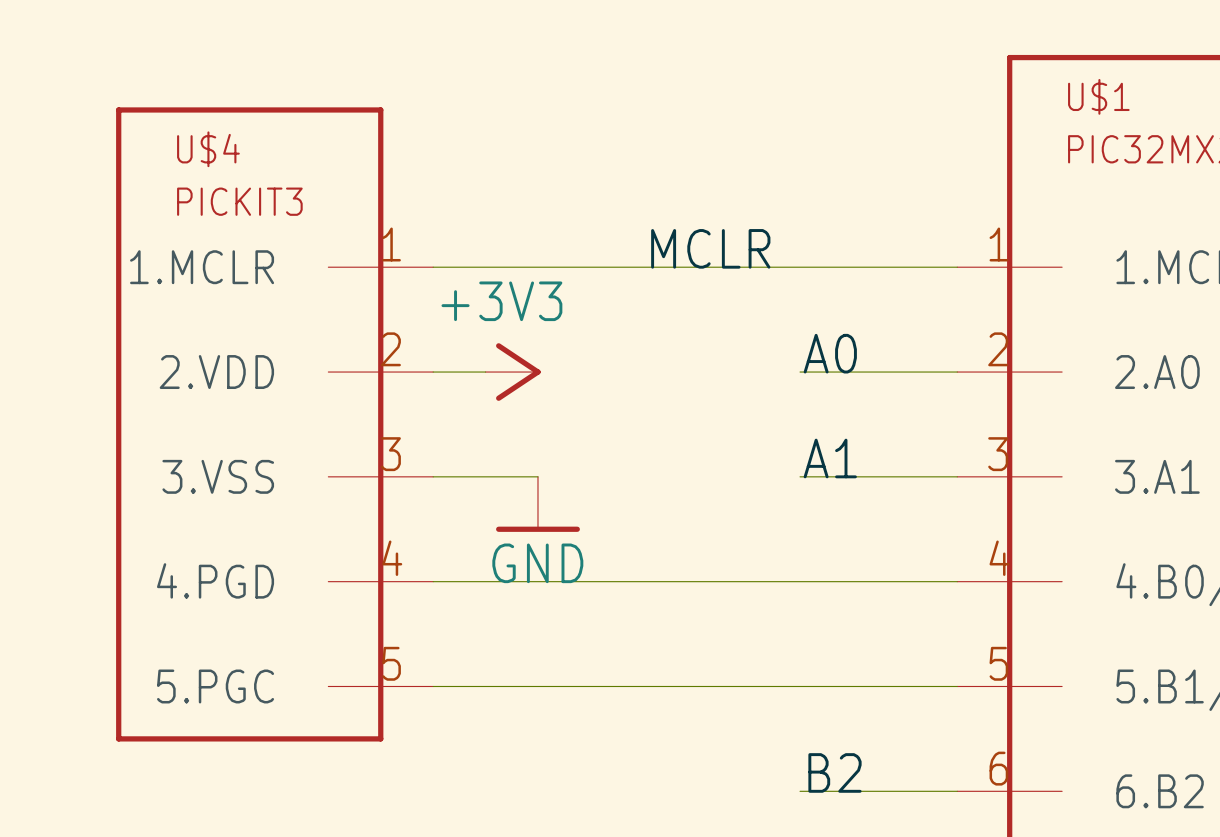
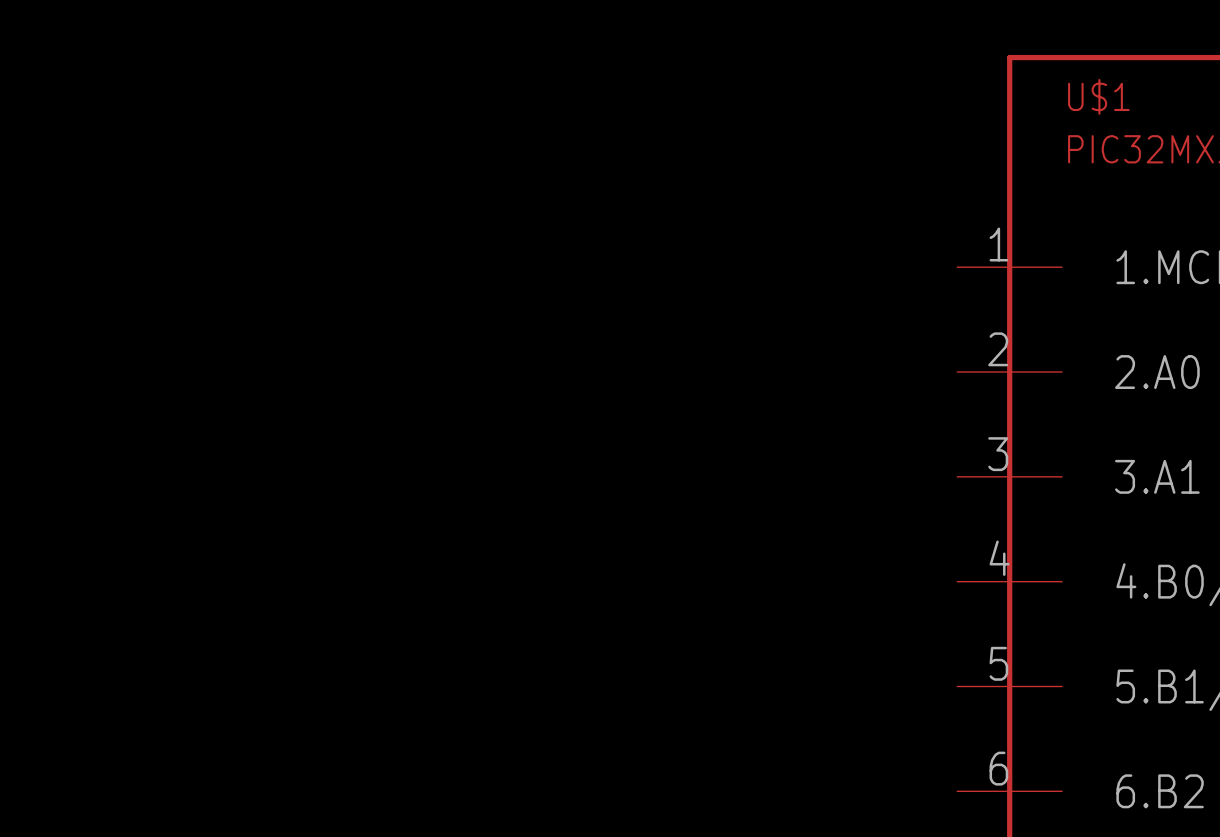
label: MCLR (710, 248) -> none
wire: (433, 267) (957, 267) -> none
label: A0 (830, 353) -> none
wire: (433, 372) (485, 372) -> none
power symbol: +3V3 (513, 372) -> none
wire: (800, 372) (957, 372) -> none
U$4: PICKIT3 (274, 424) -> none
label: A1 (830, 458) -> none
wire: (433, 476) (537, 476) -> none
wire: (800, 476) (957, 476) -> none
power symbol: GND (537, 504) -> none
wire: (433, 581) (957, 581) -> none
wire: (433, 686) (957, 686) -> none
label: B2 (834, 772) -> none
wire: (800, 791) (957, 791) -> none

